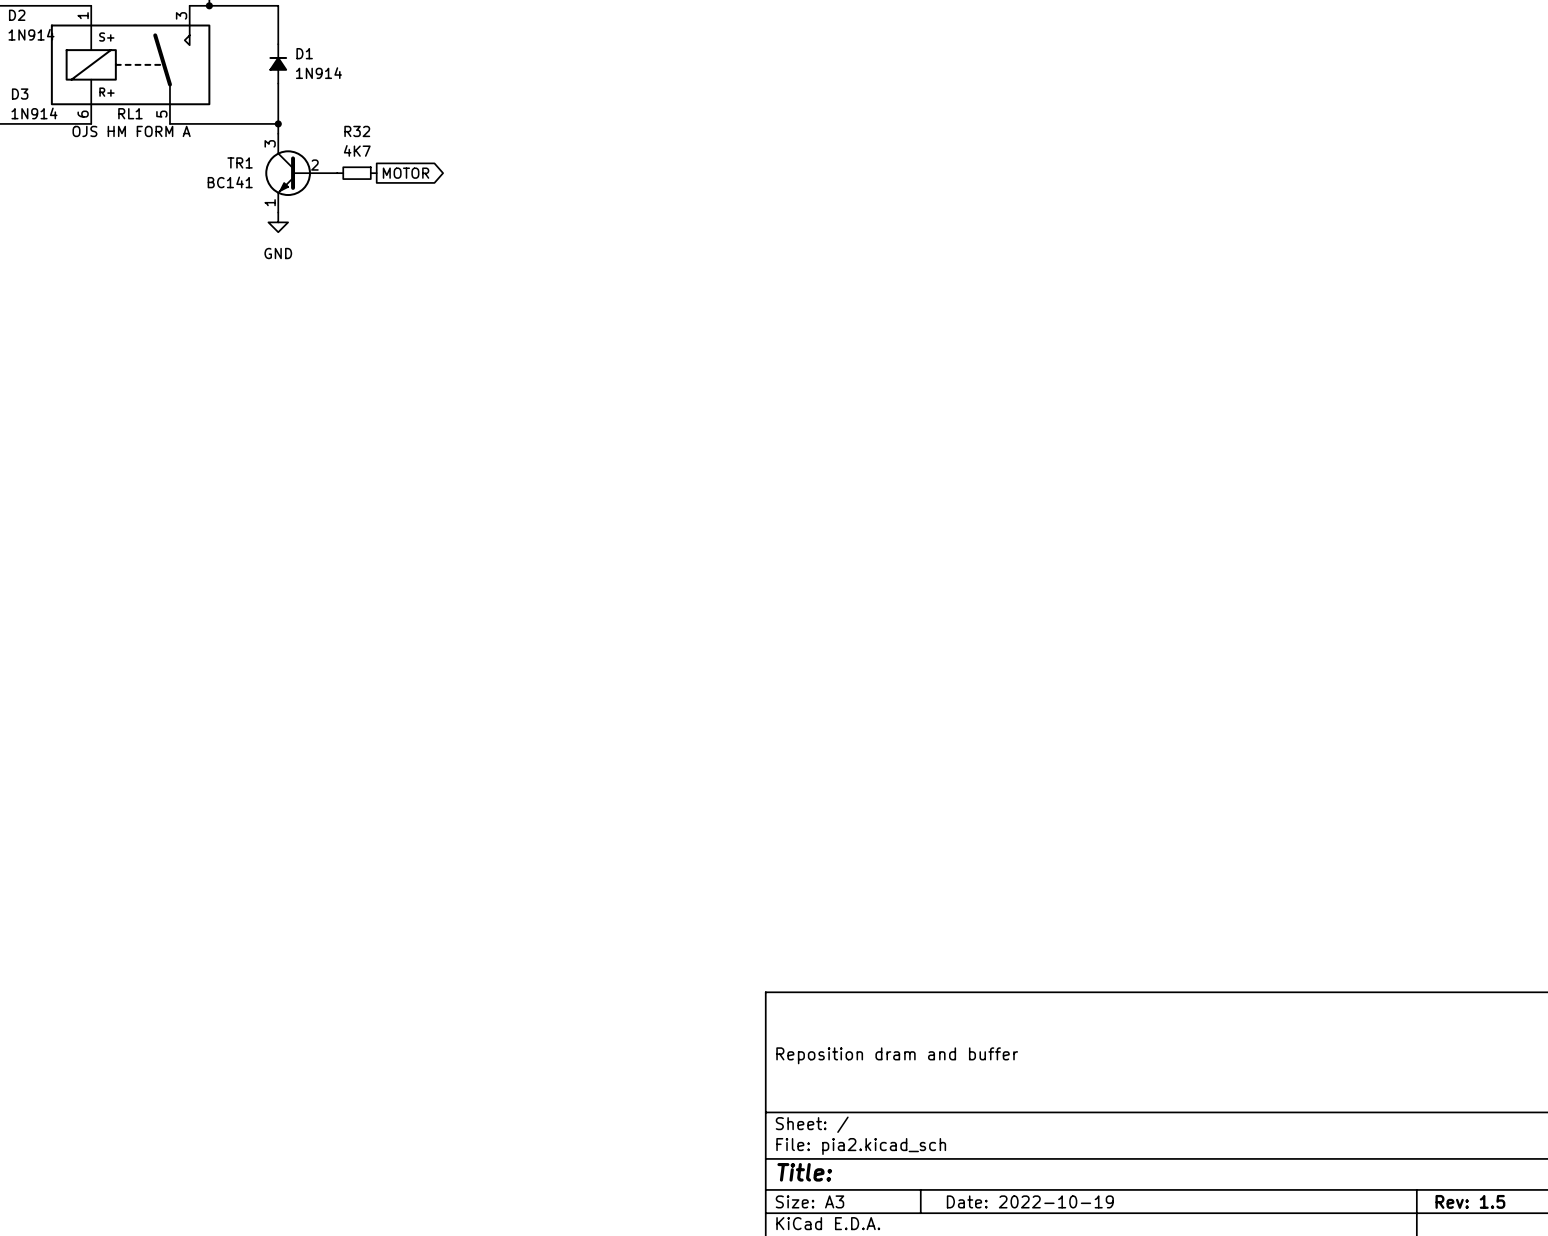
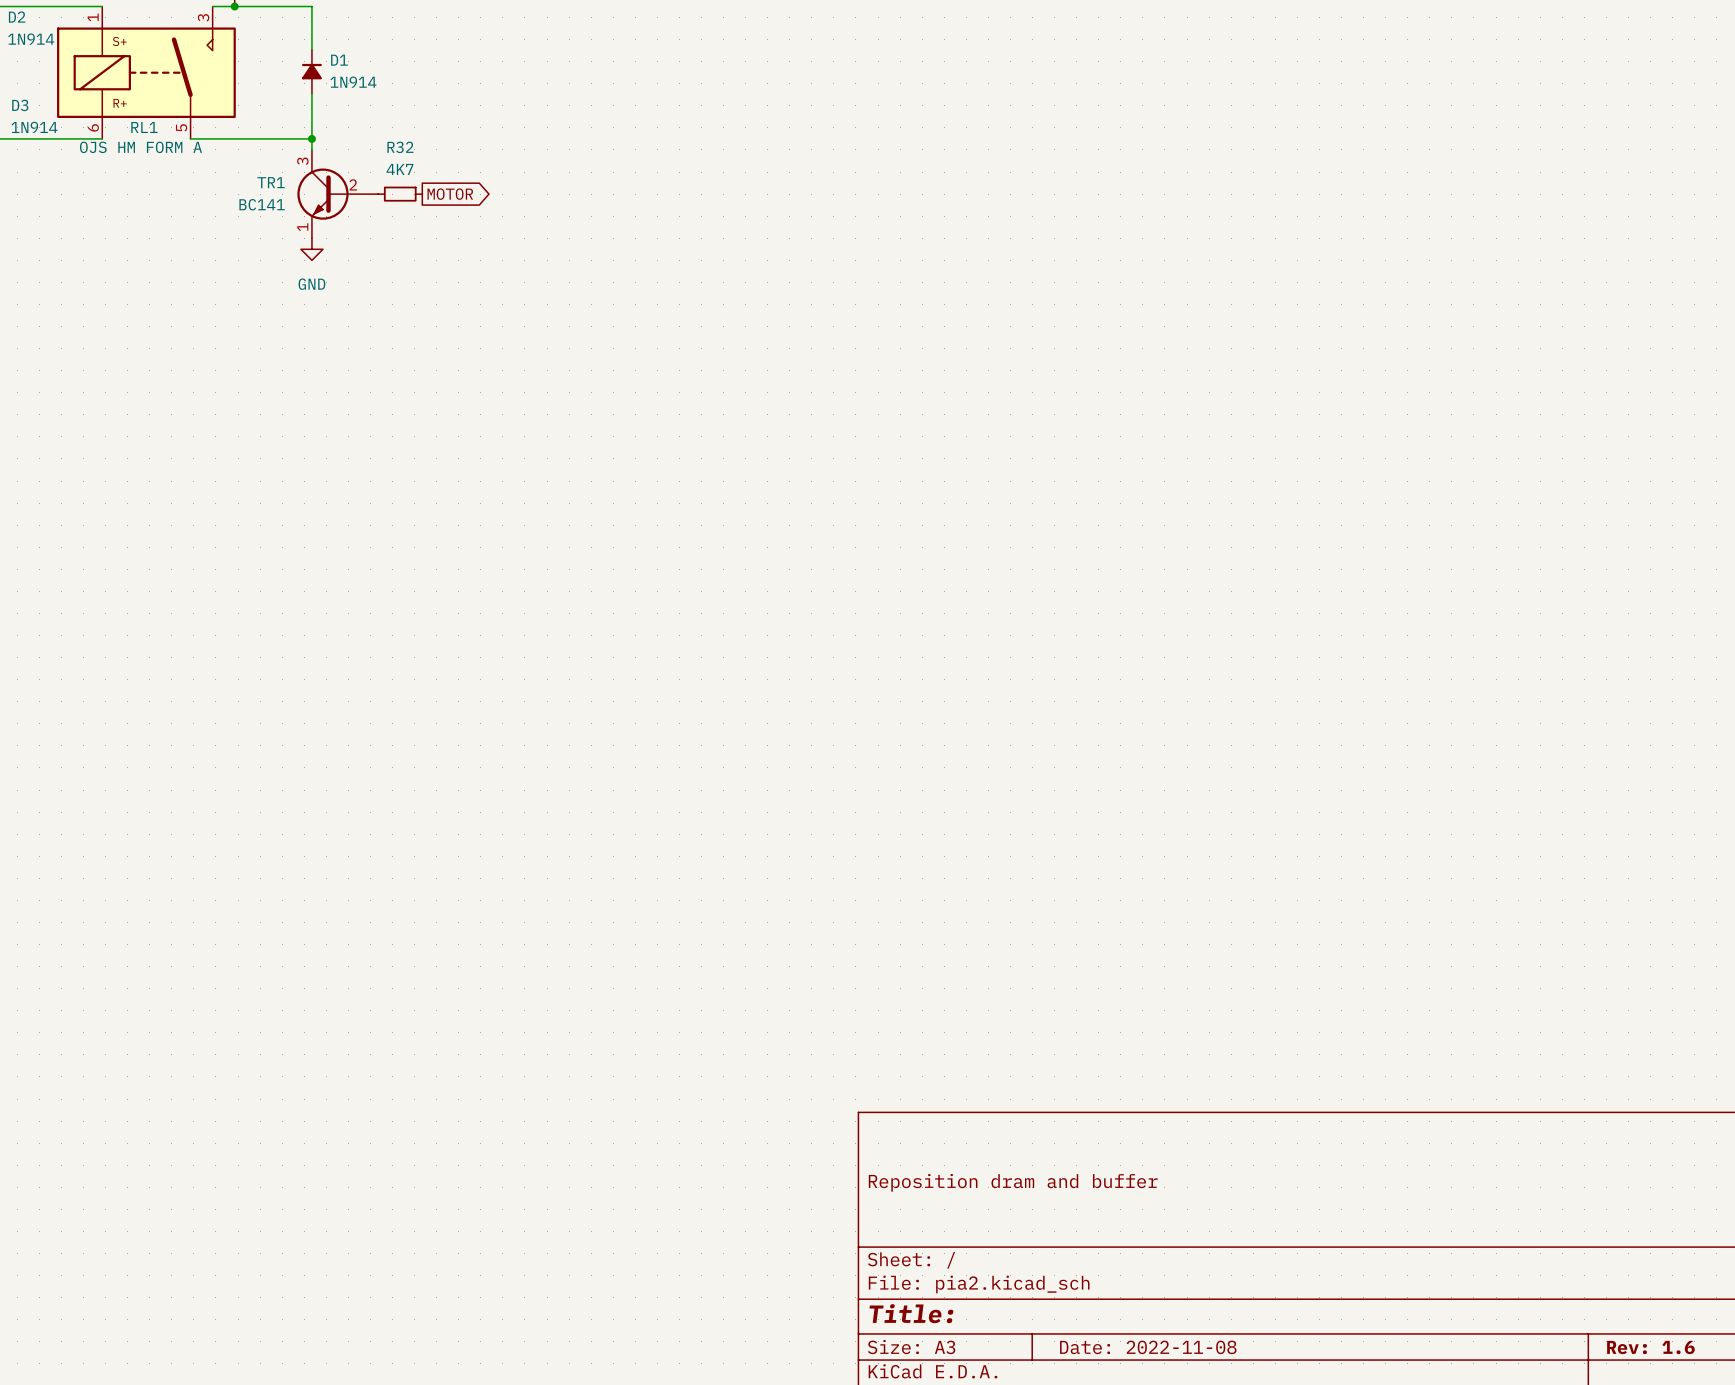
title block: Date: 2022-10-19 (1030, 1201) -> Date: 2022-11-08 (1148, 1347)
title block: Rev: 1.5 (1470, 1201) -> Rev: 1.6 (1650, 1347)

